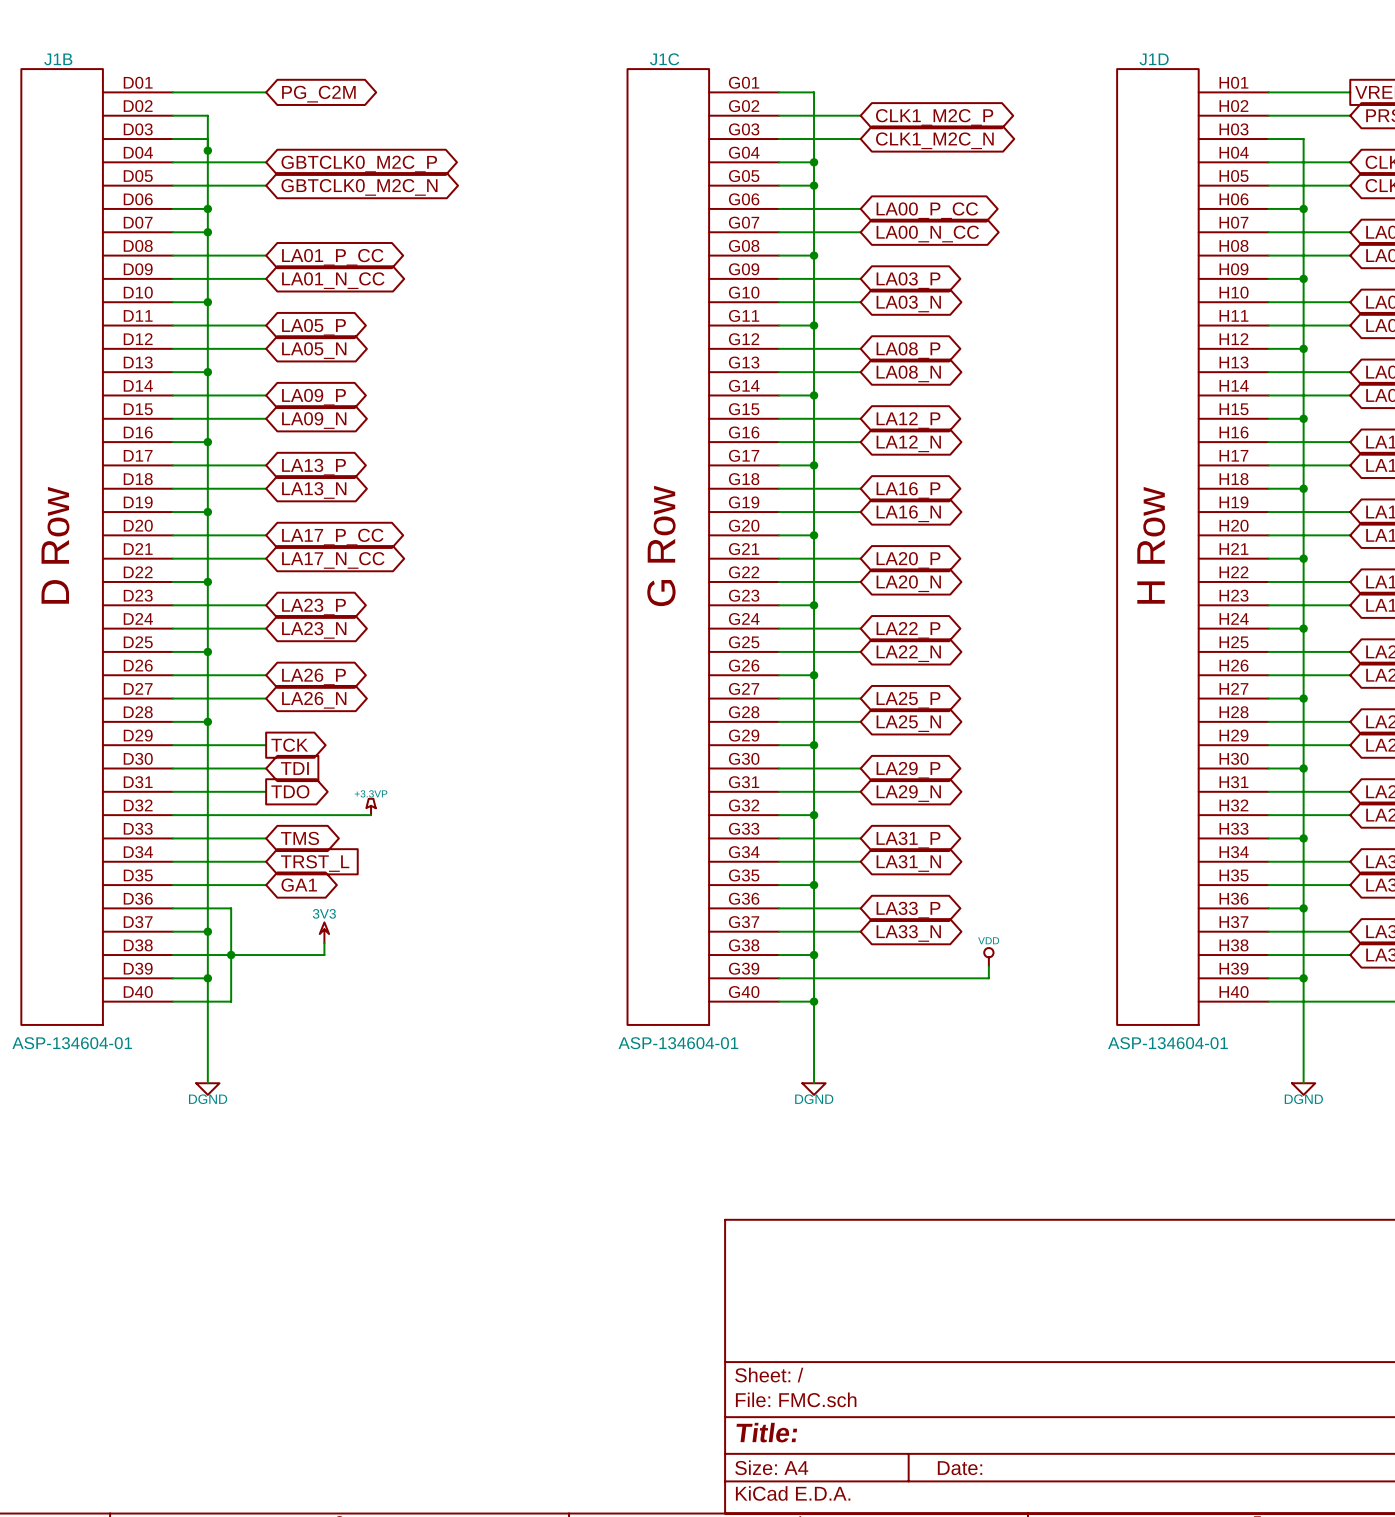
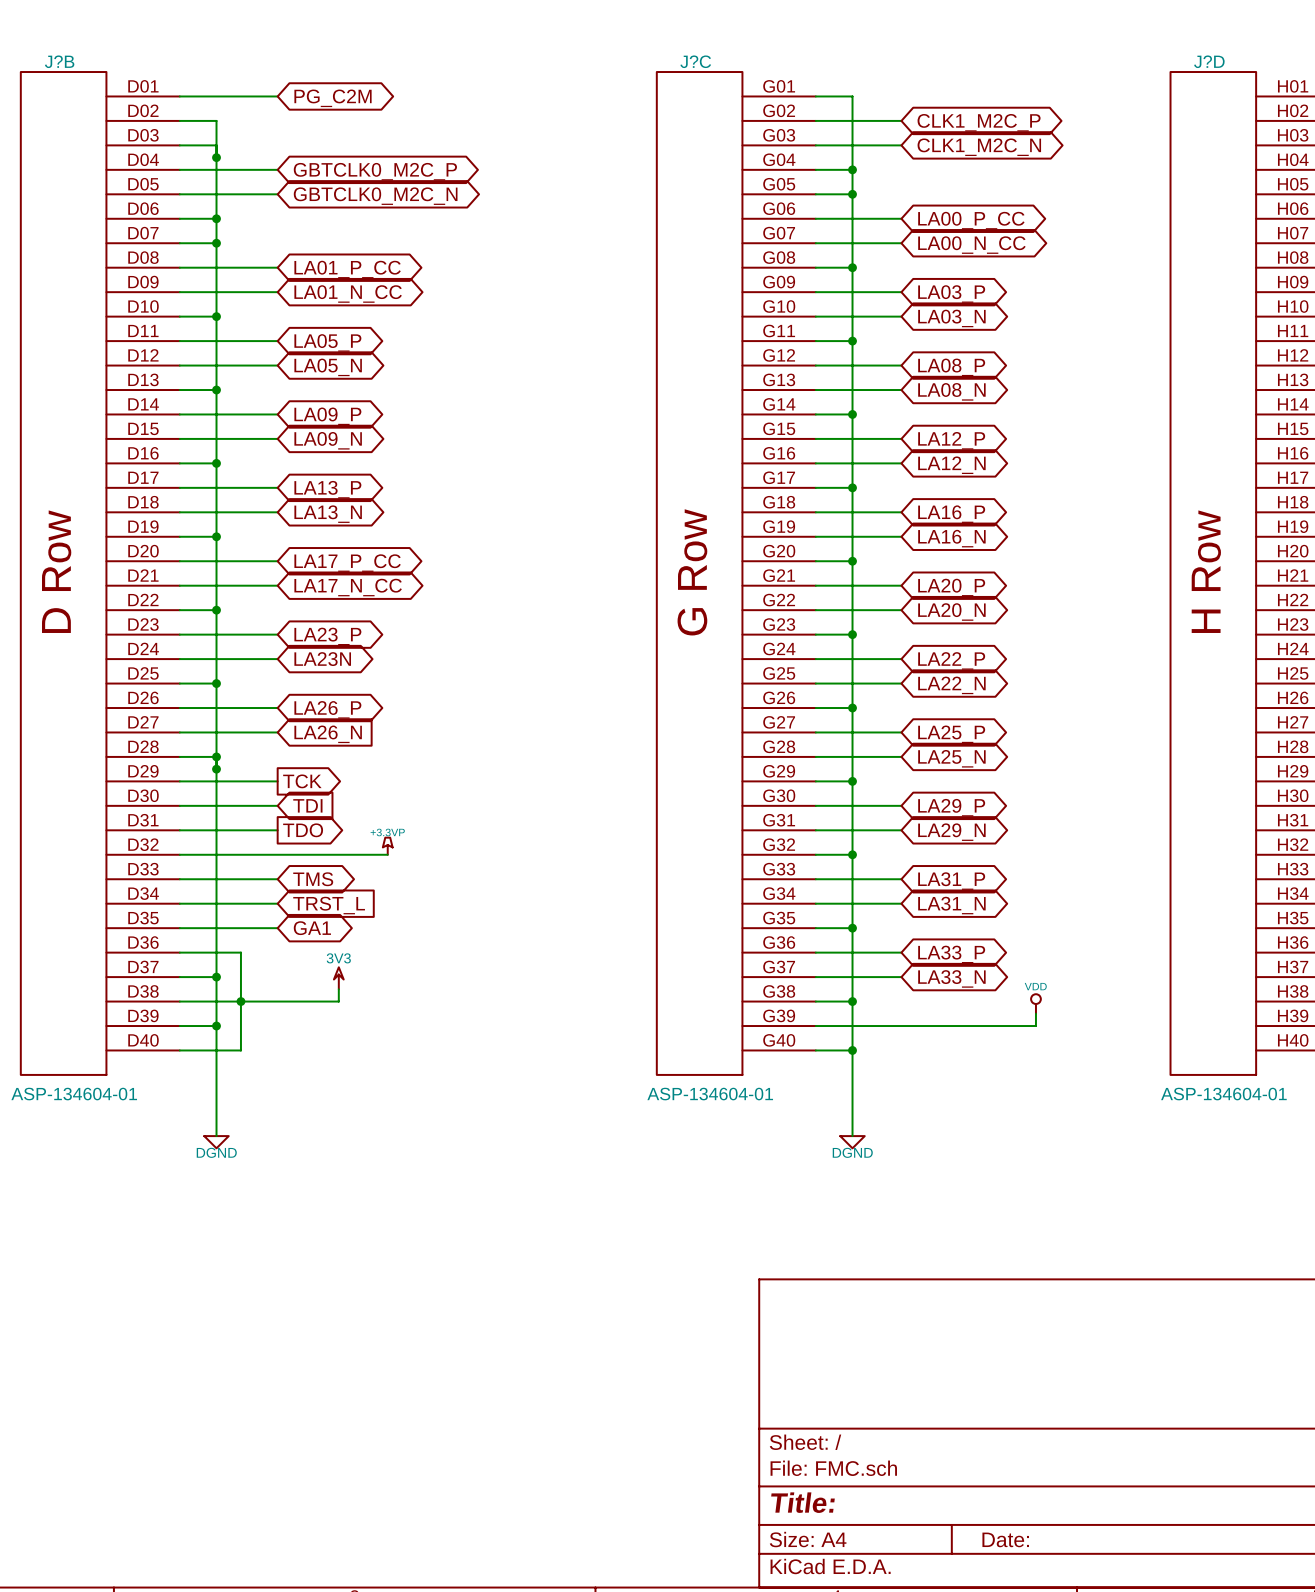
J1B name: J1B (58, 59) -> J?B (59, 61)
J1C name: J1C (664, 59) -> J?C (695, 61)
J1D name: J1D (1154, 59) -> J?D (1209, 61)
global label: LA23_N (314, 630) -> LA23N (322, 659)
global label shape: bidirectional (314, 700) -> input (328, 734)
junction: none -> (216, 769)

